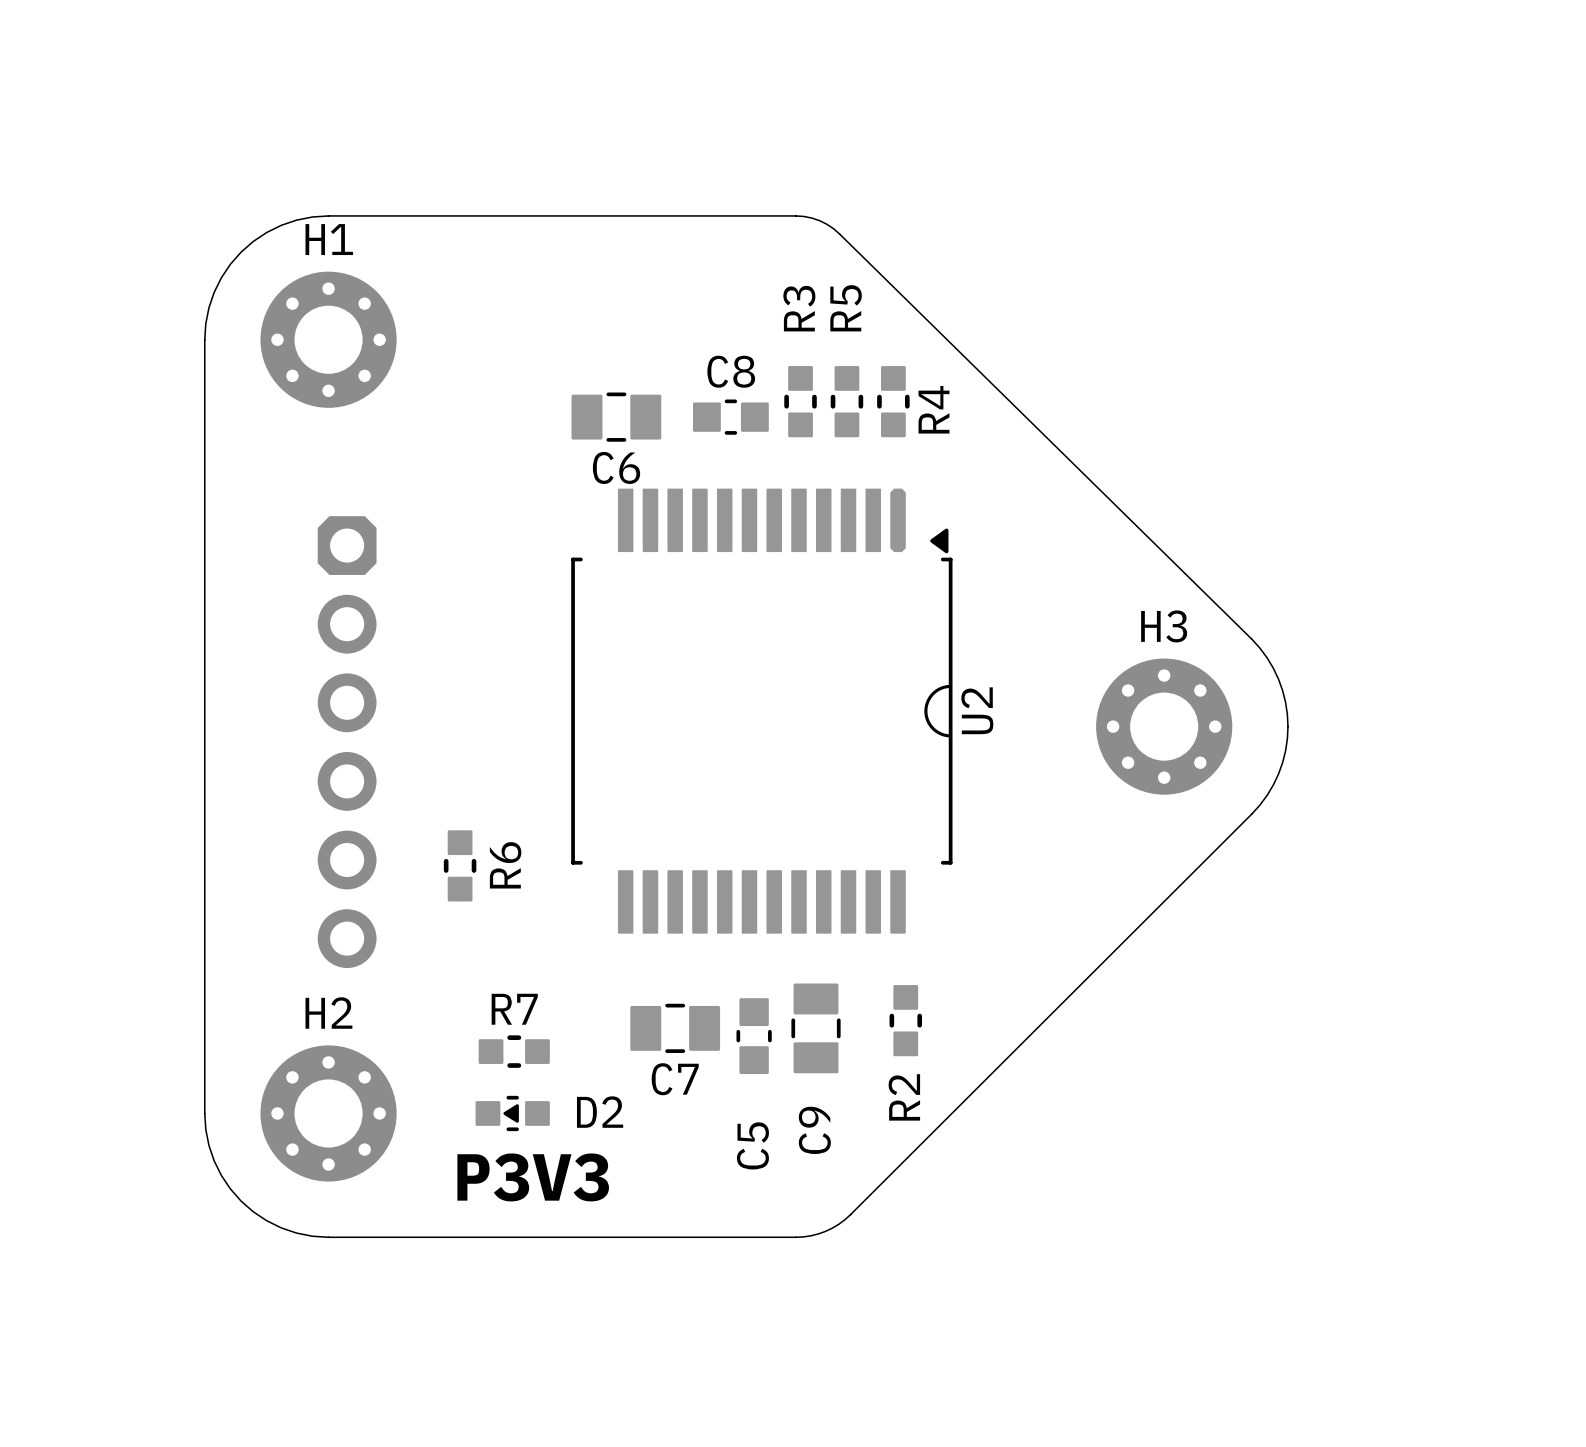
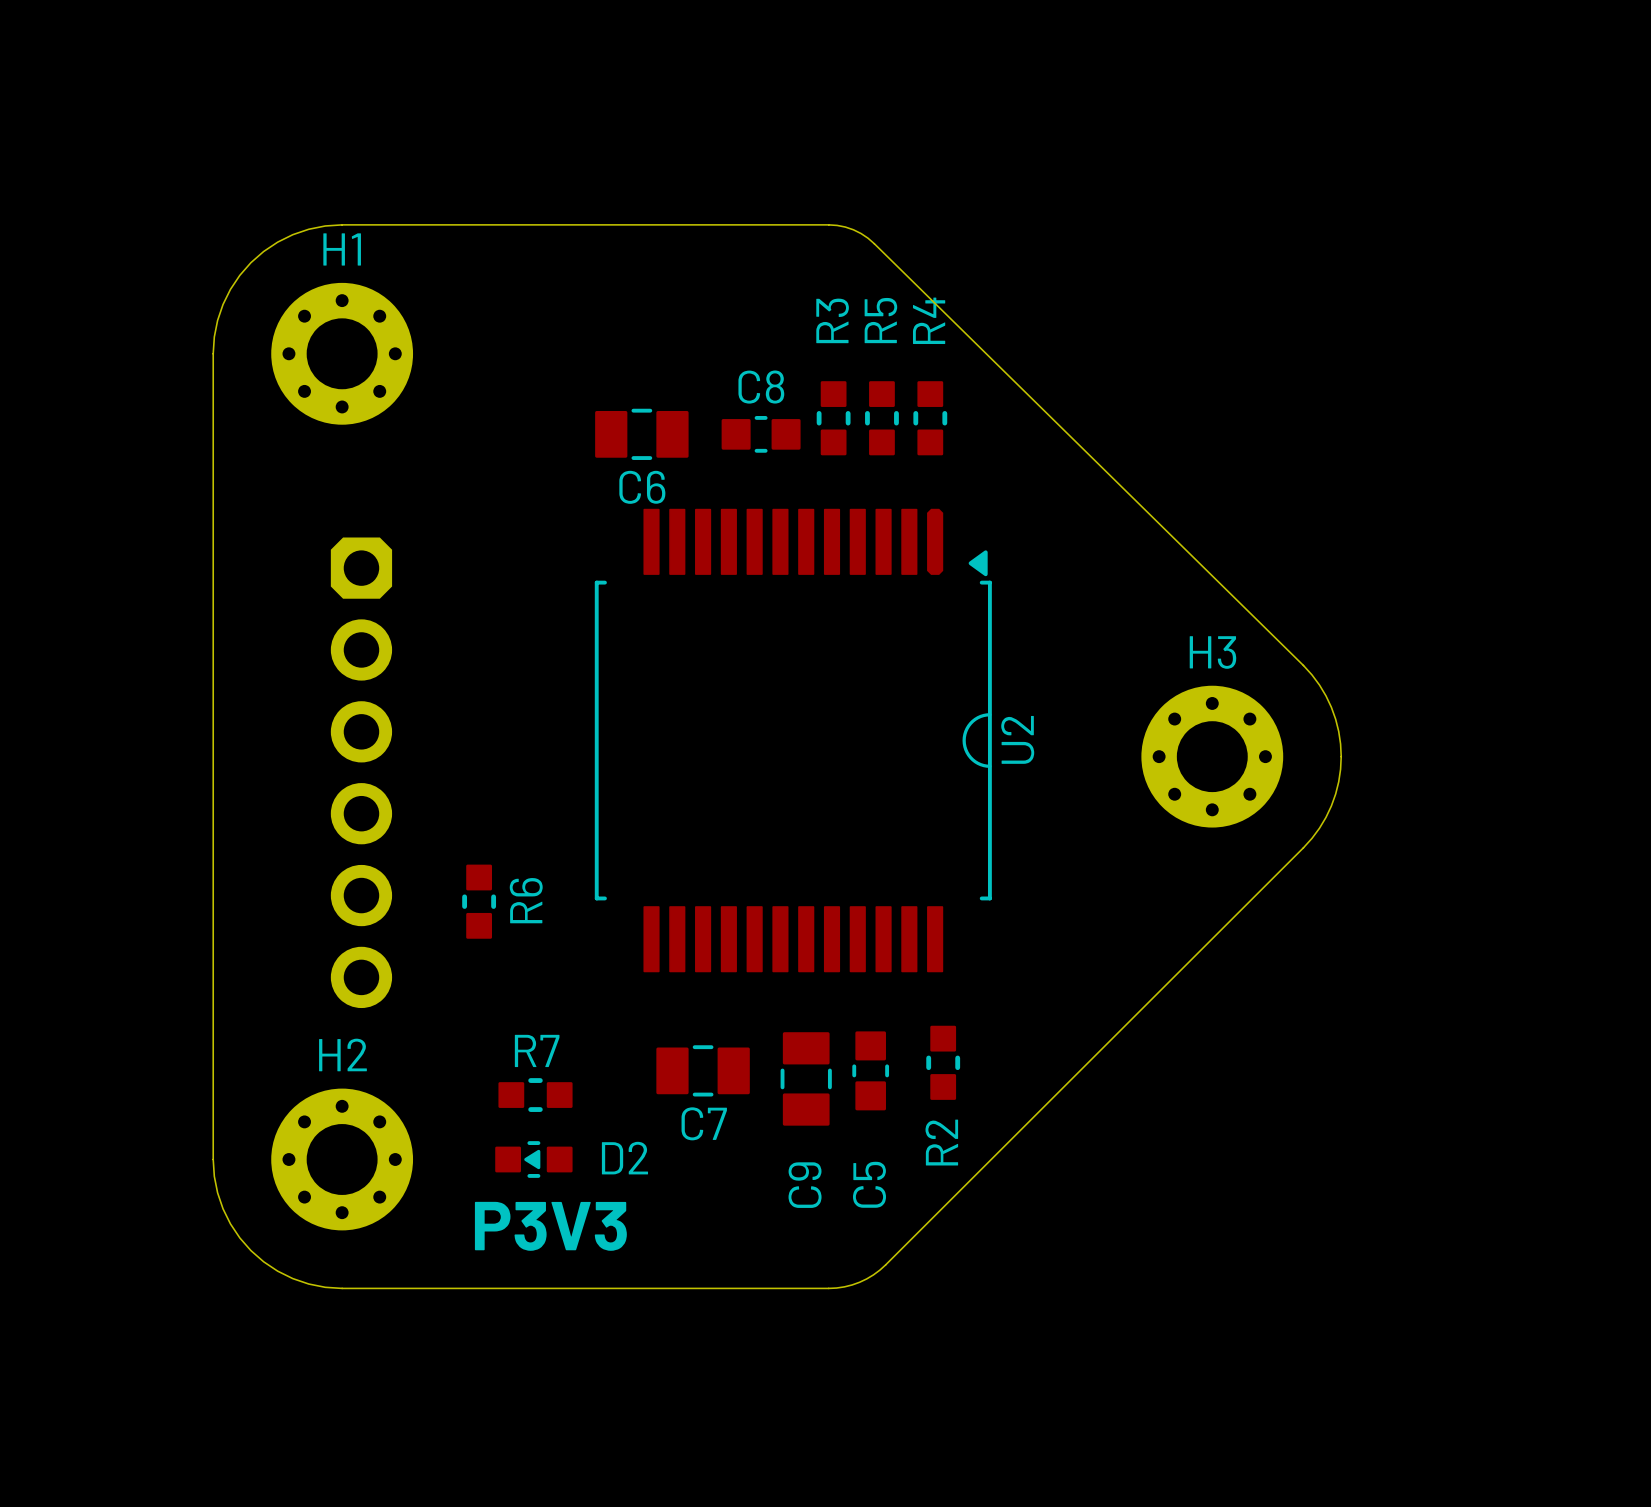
R4 name position: R4 (934, 409) -> R4 (929, 320)
C9 position: (816, 1028) -> (806, 1078)
C5 position: (754, 1036) -> (870, 1070)

